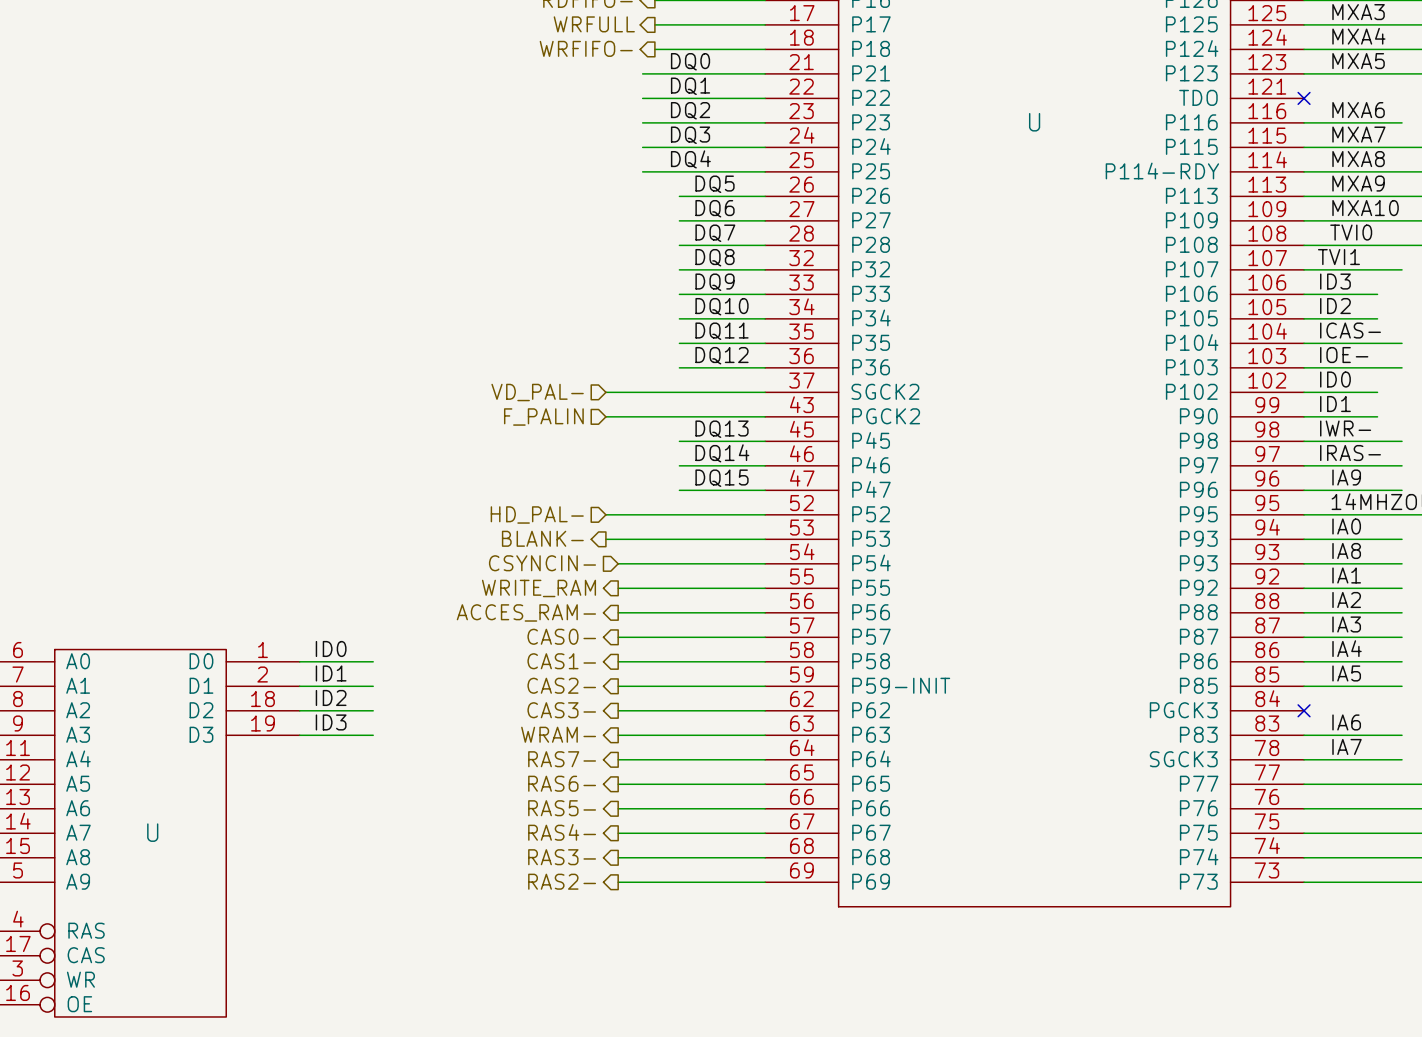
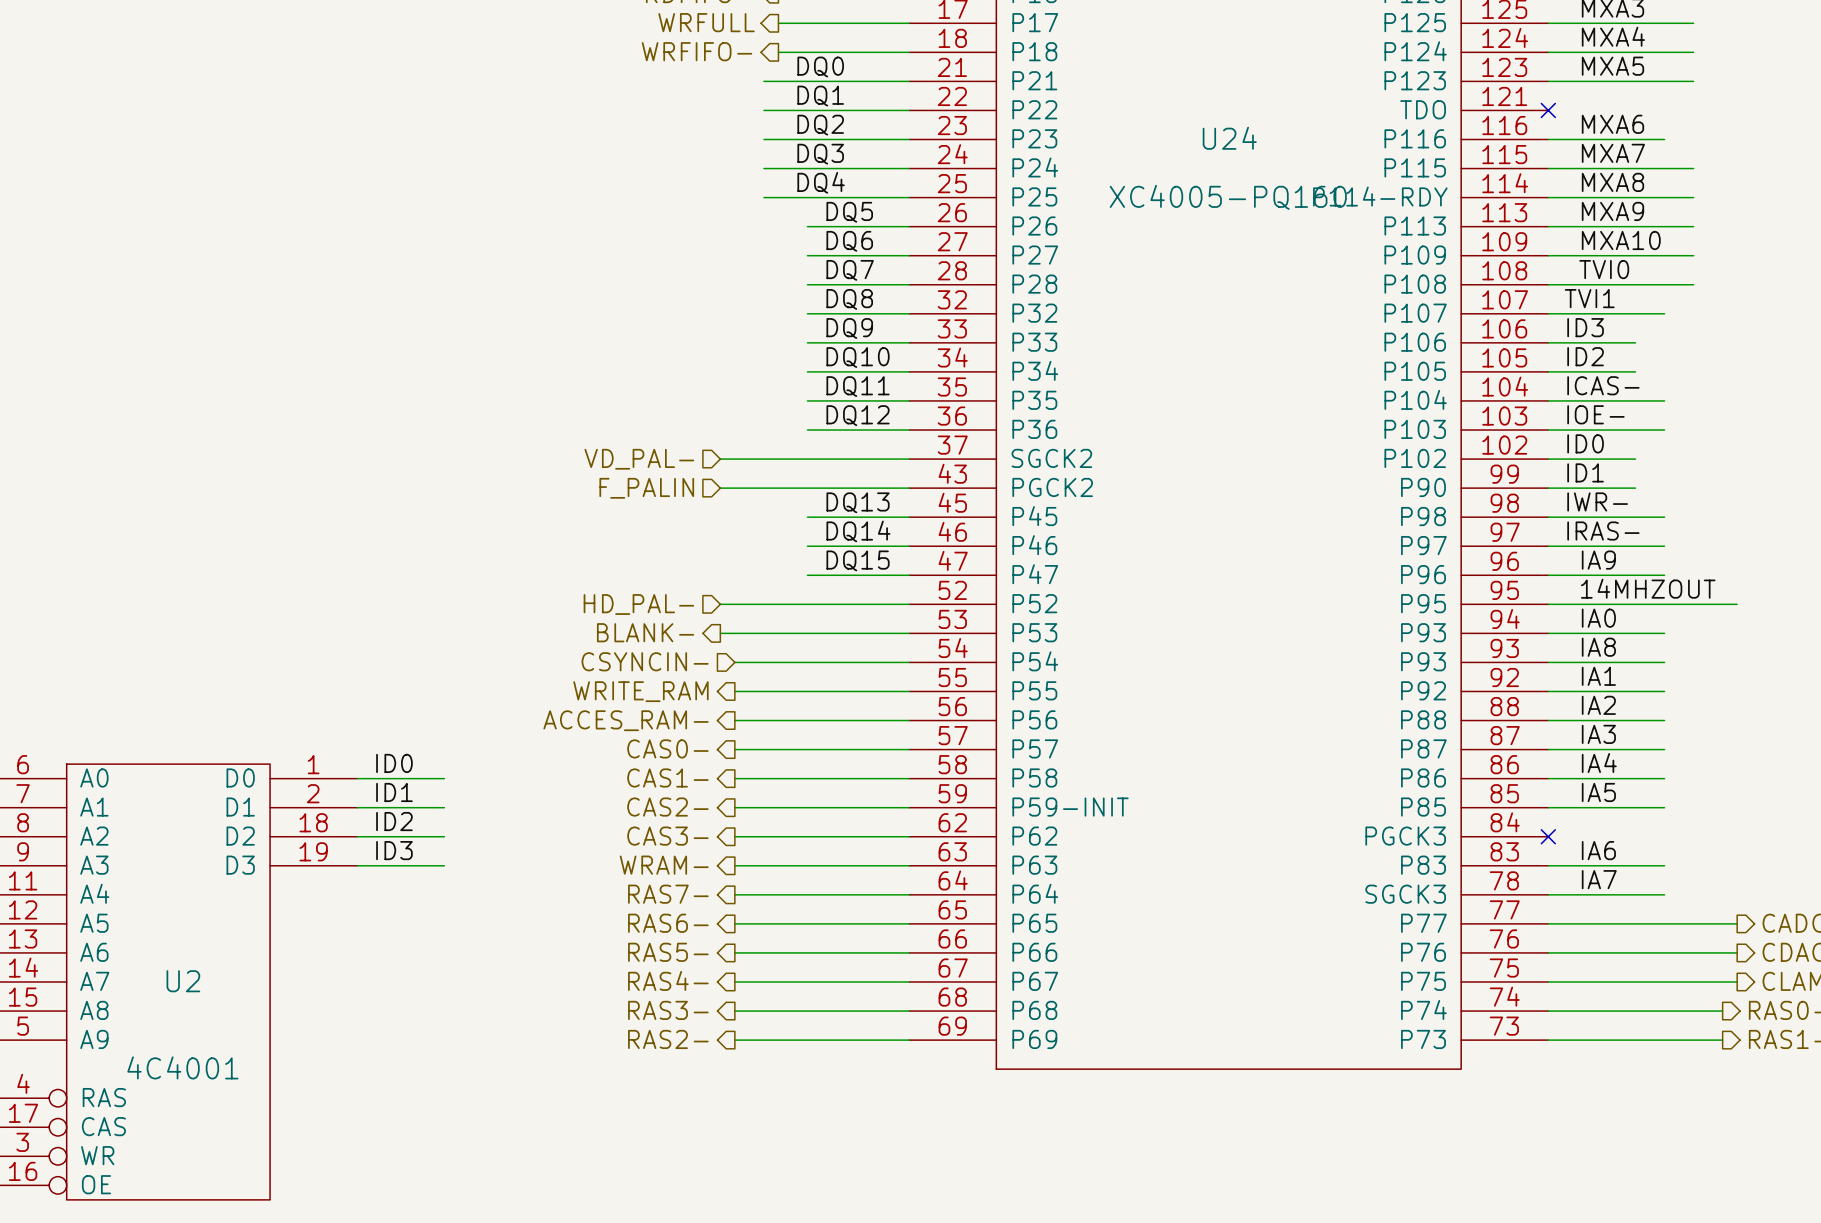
U name: U (1034, 122) -> U24 (1229, 138)
U value: none -> XC4005-PQ160 (1228, 197)
U name: U (152, 832) -> U2 (183, 981)
U value: none -> 4C4001 (182, 1067)

